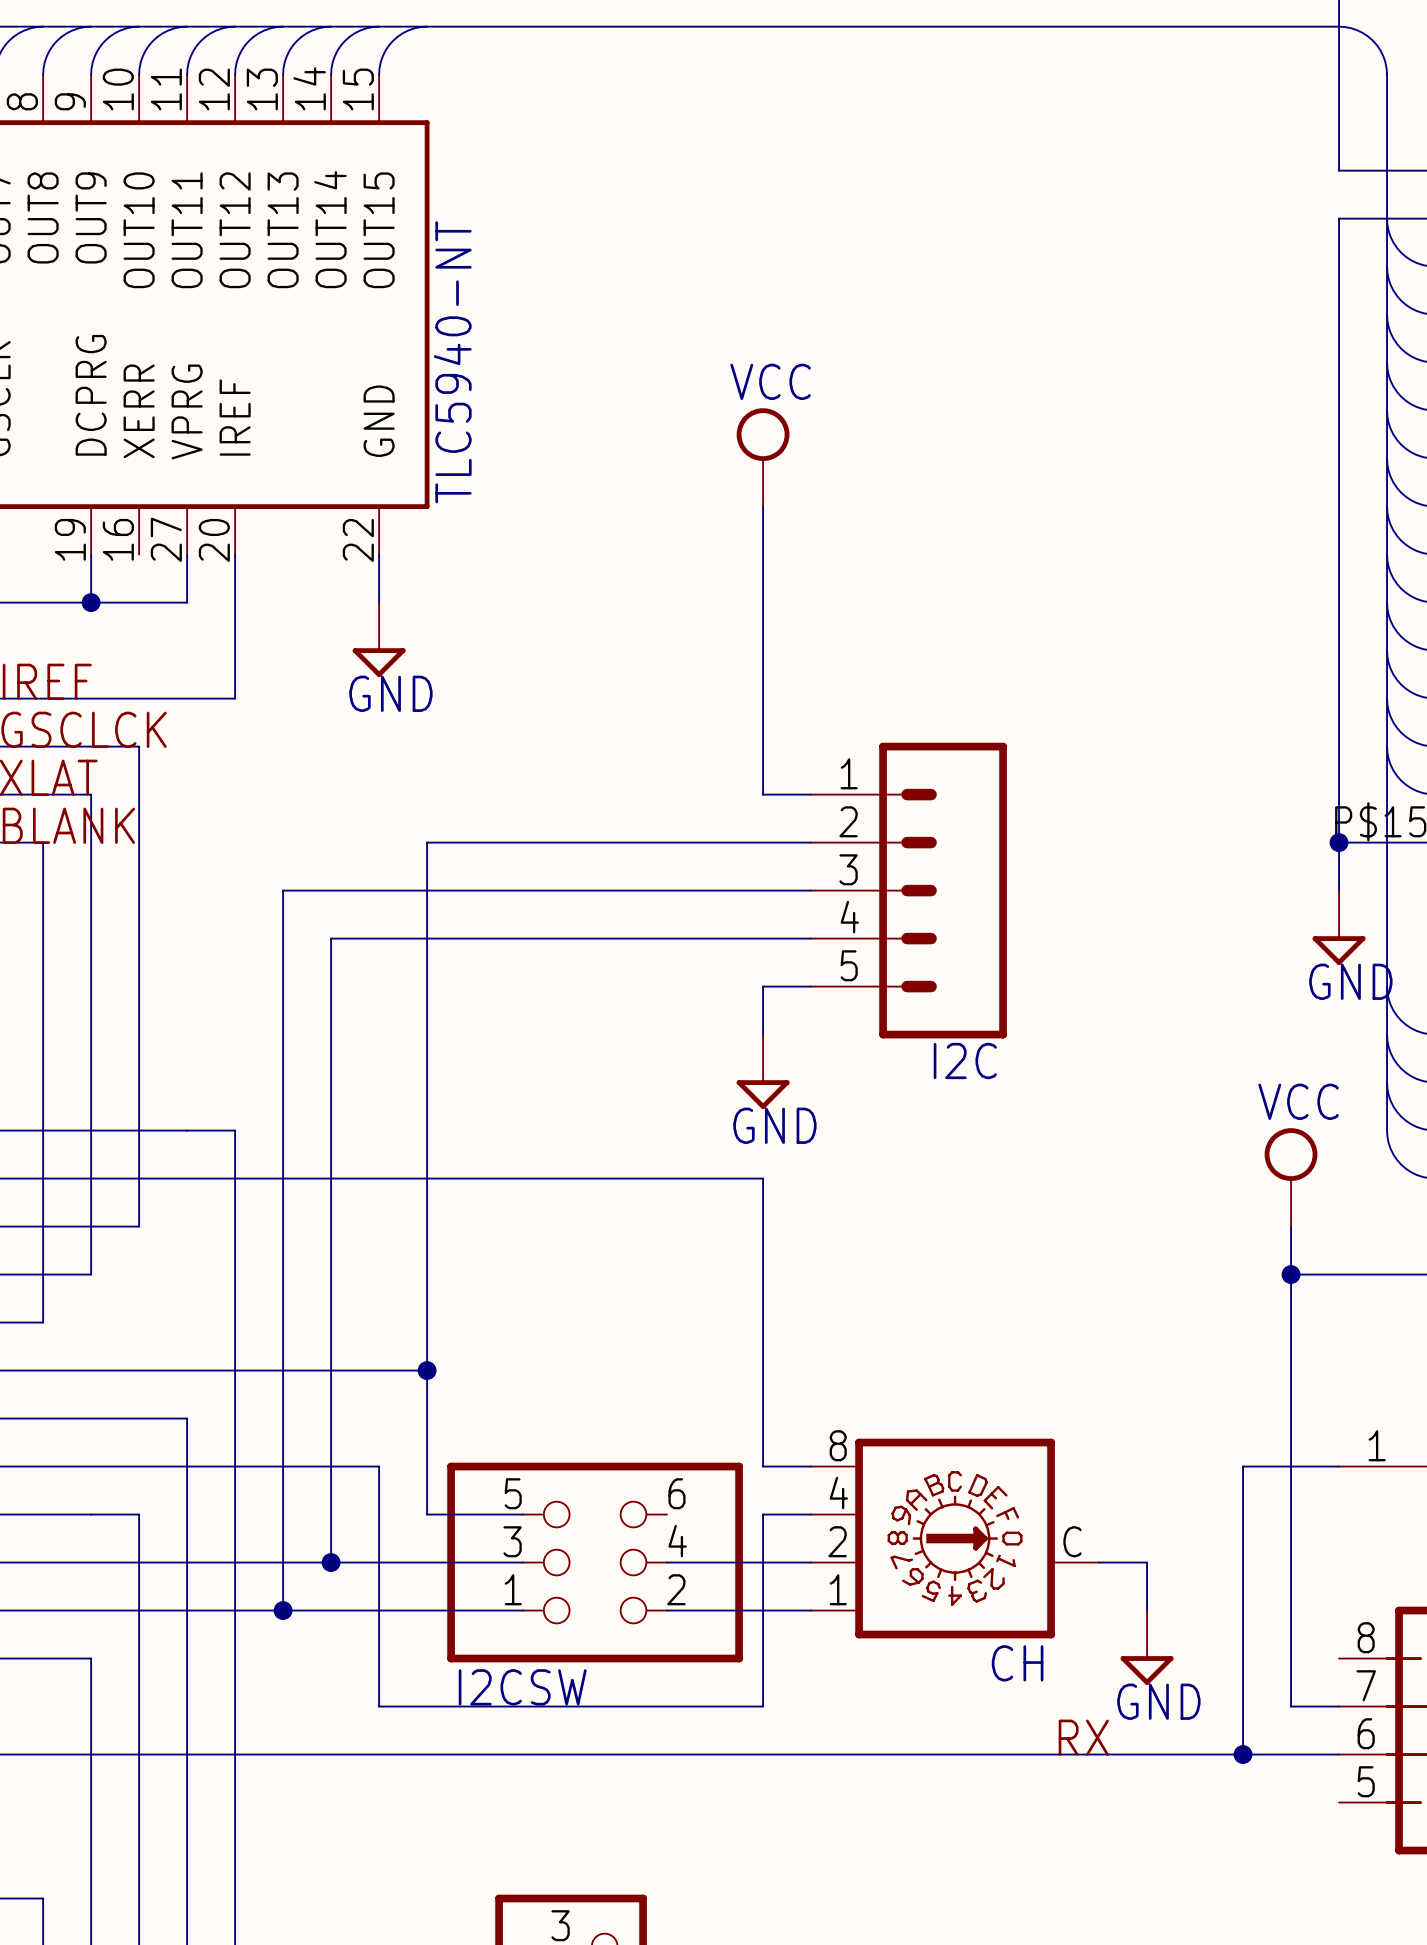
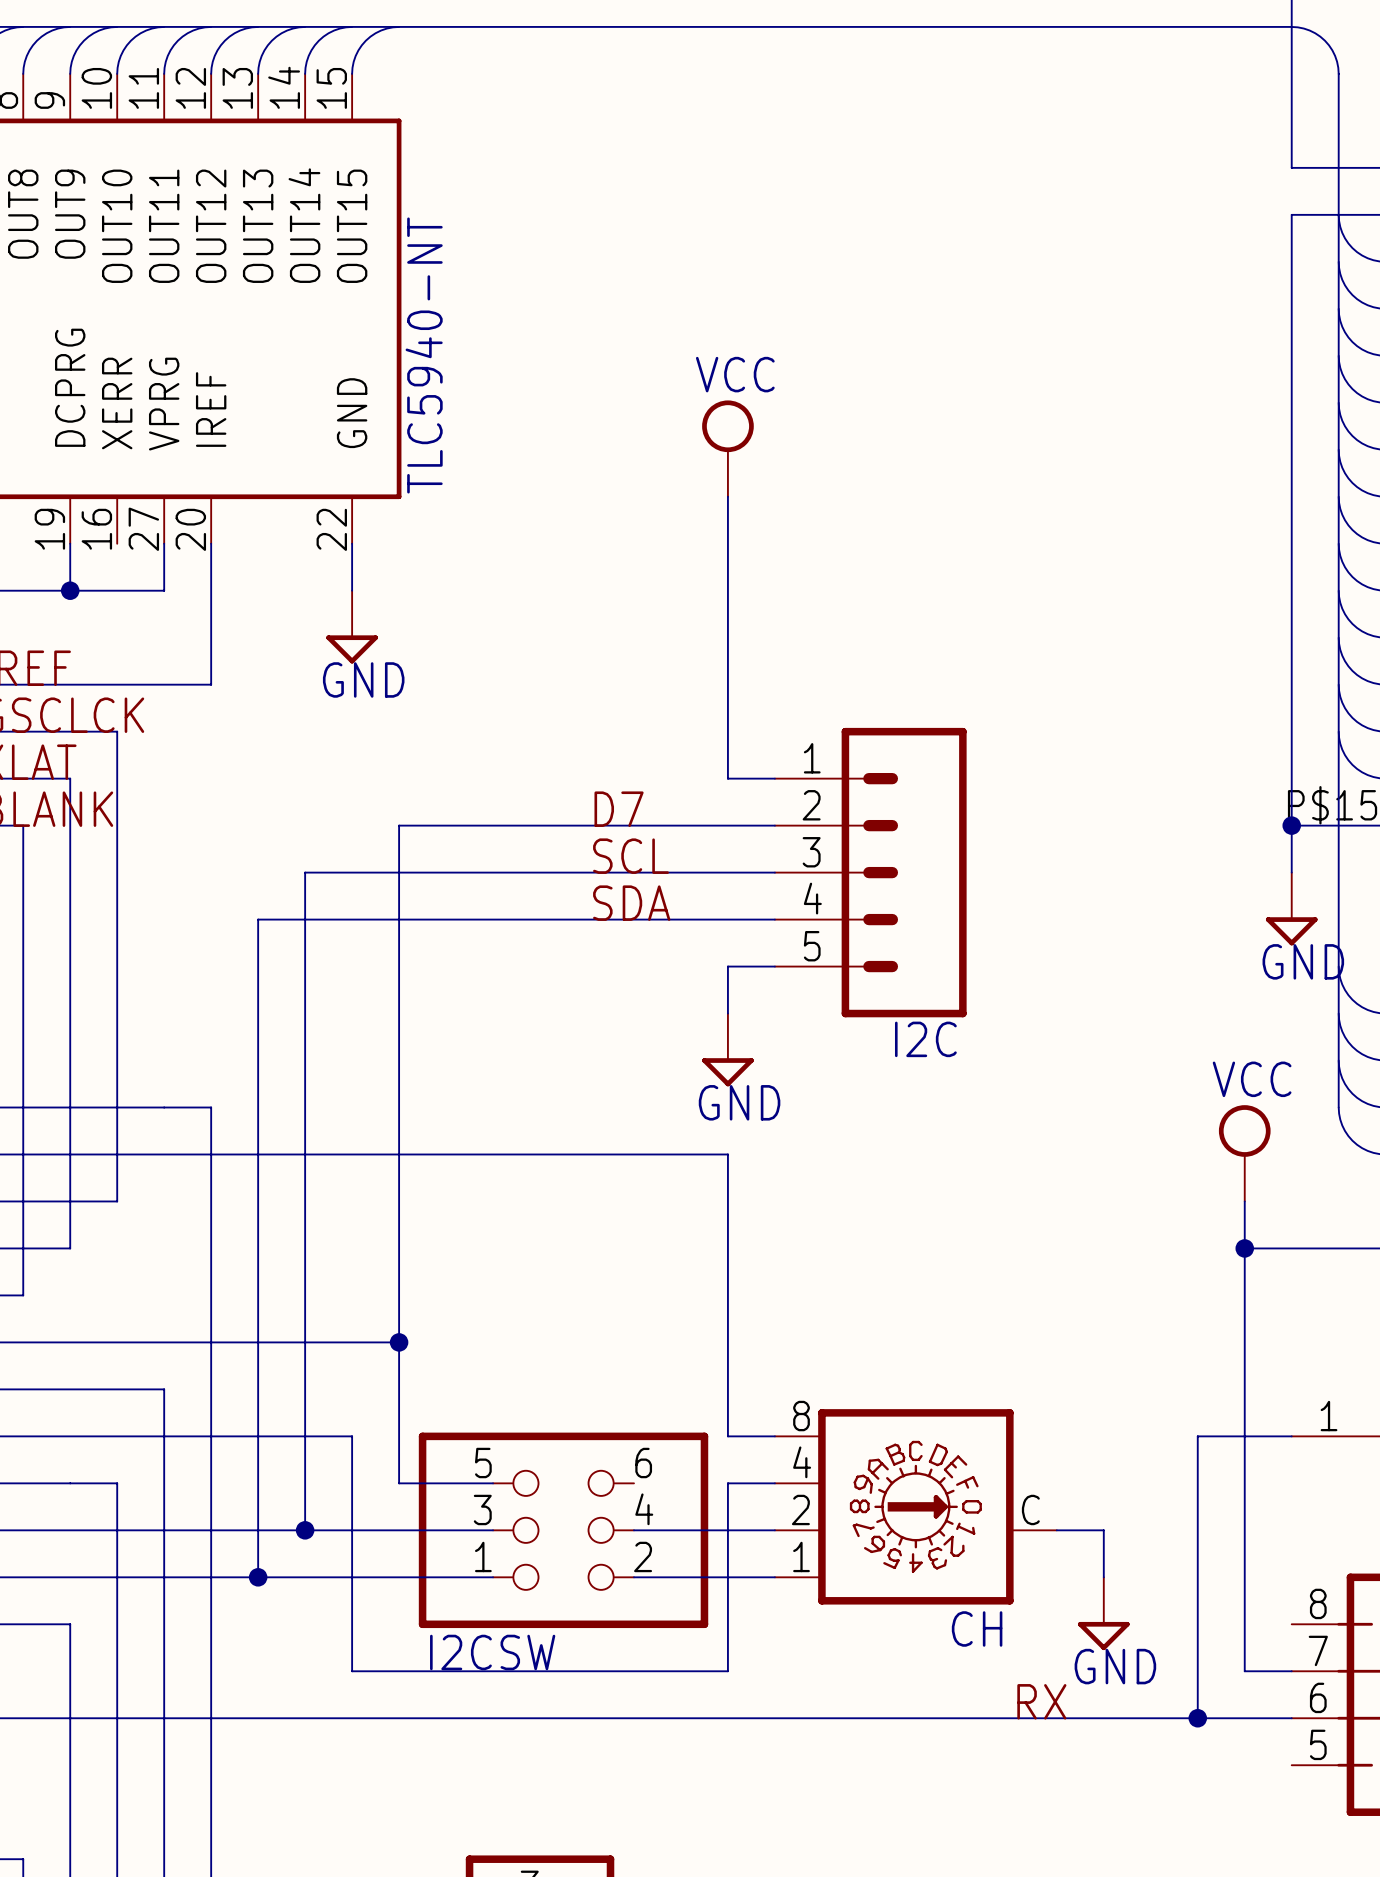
label: none -> D7 (619, 809)
label: none -> SCL (631, 856)
wire: (331, 890) (283, 890) (283, 938) -> (305, 872) (305, 919) (258, 919)
label: none -> SDA (631, 903)

